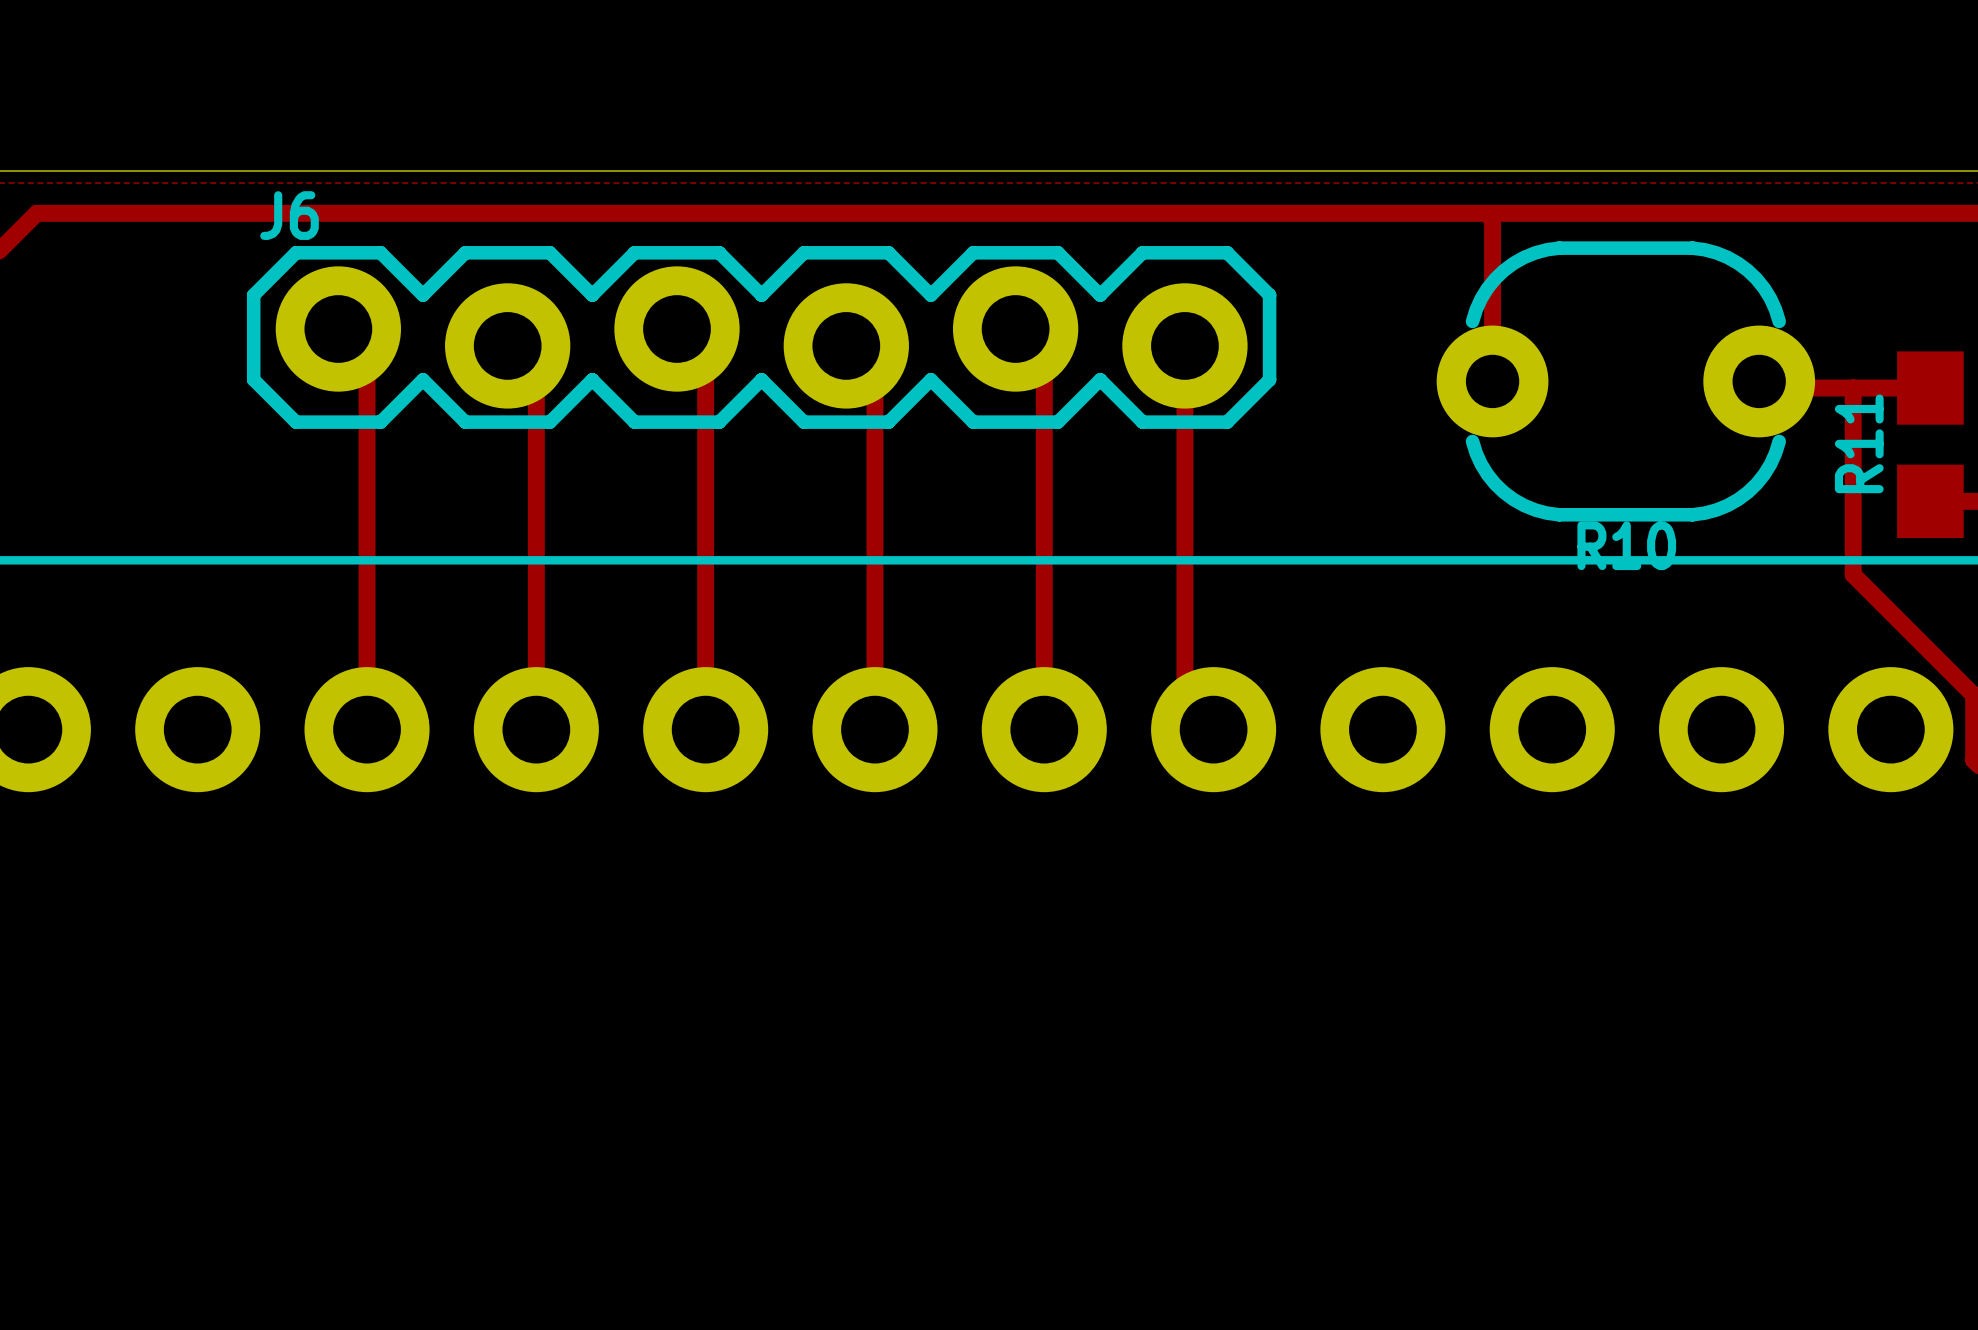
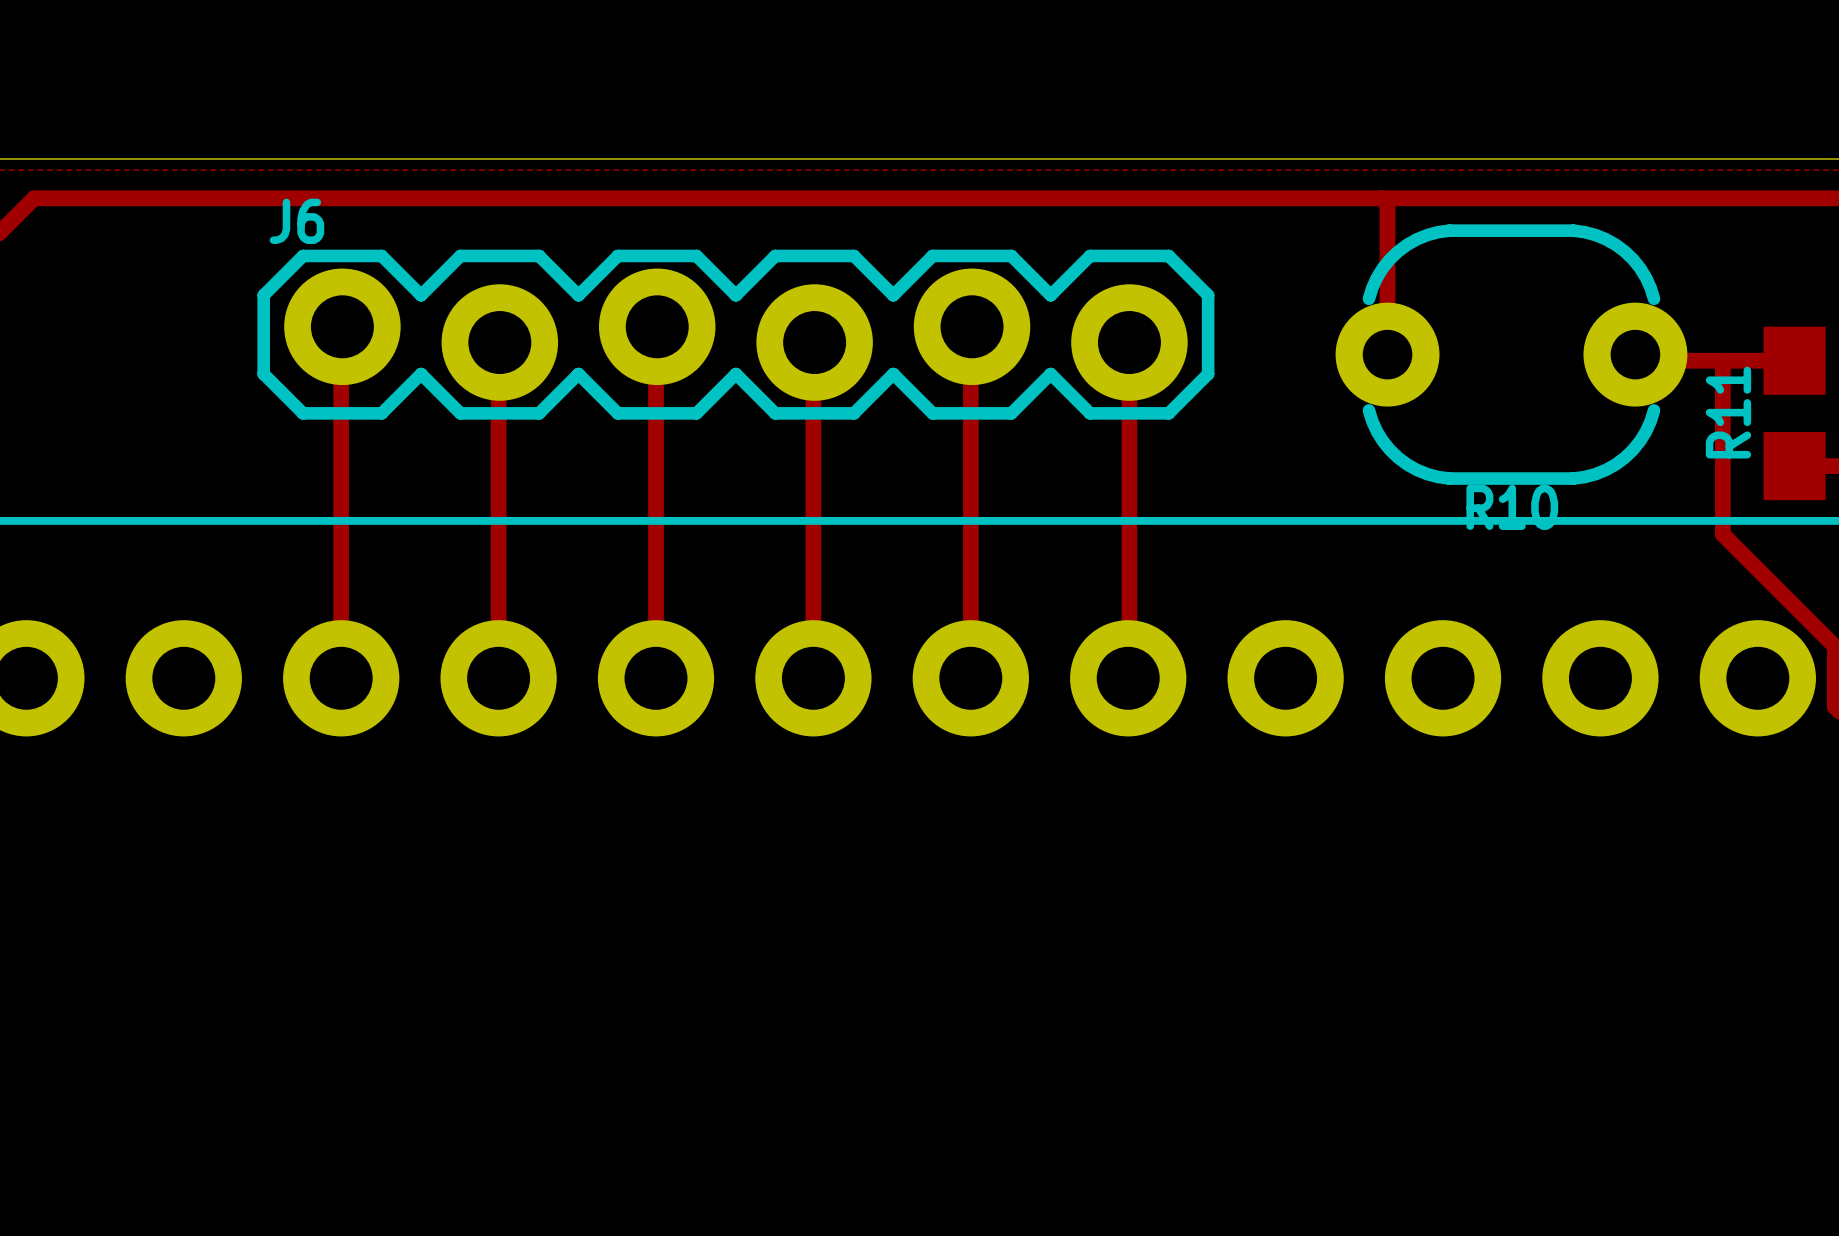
J6 position: (761, 337) -> (735, 334)
track: (1184, 345) (1184, 700) (1213, 729) -> (1129, 342) (1128, 678)

